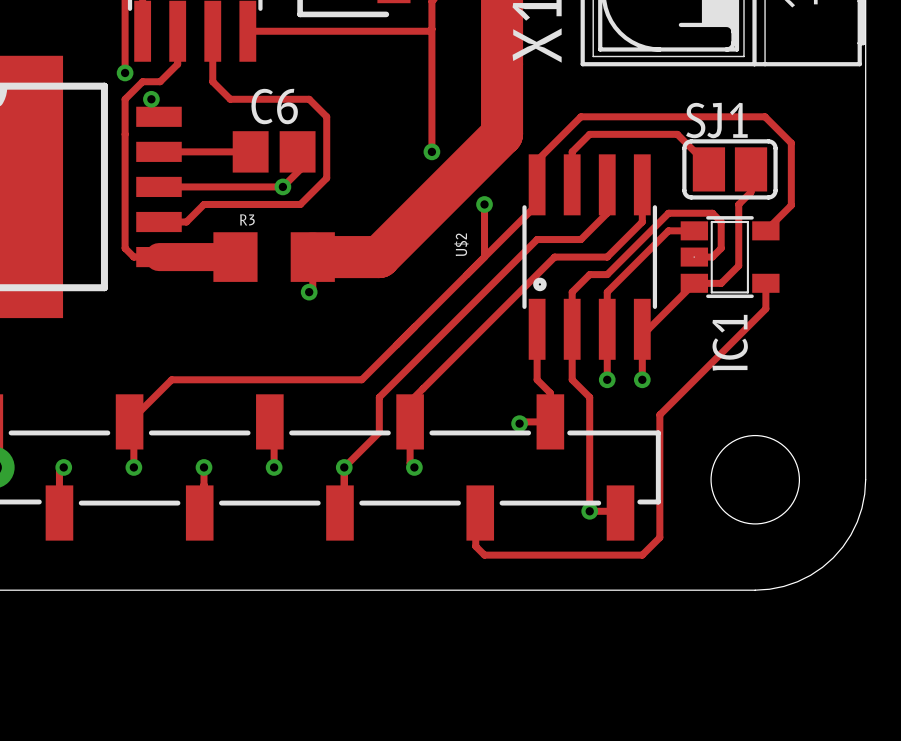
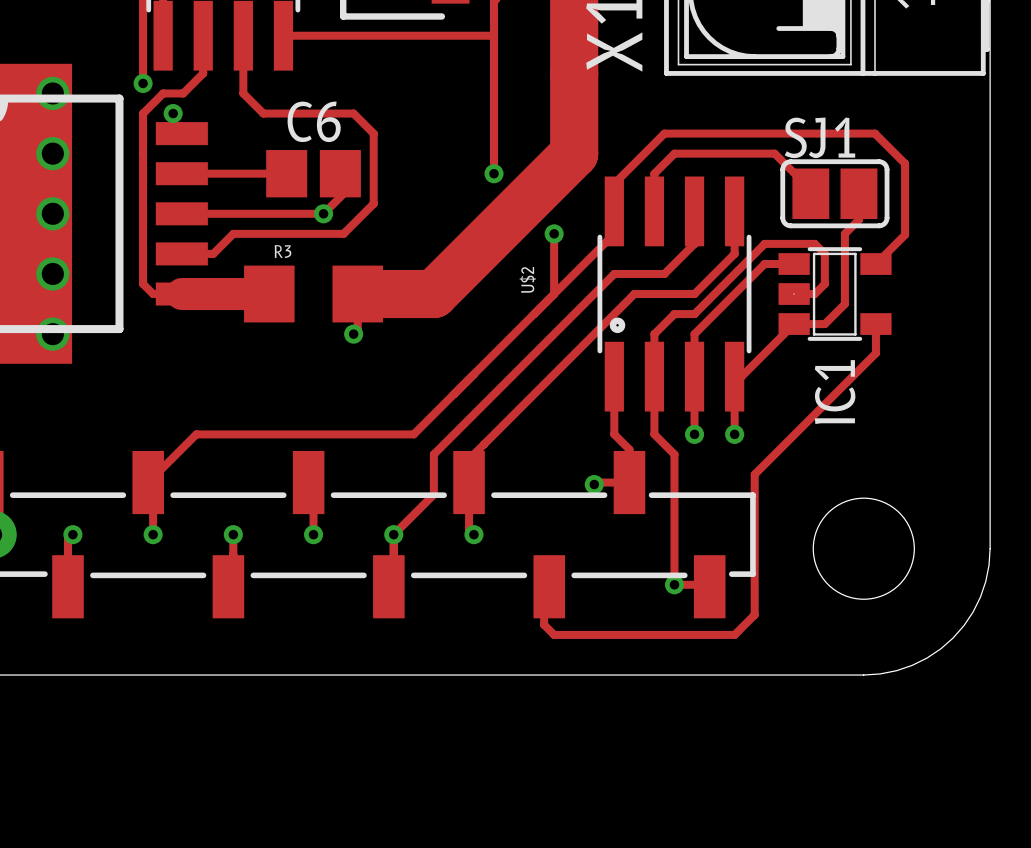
via: none -> (52, 93)
via: none -> (52, 153)
via: none -> (52, 213)
via: none -> (52, 273)
via: none -> (52, 334)

